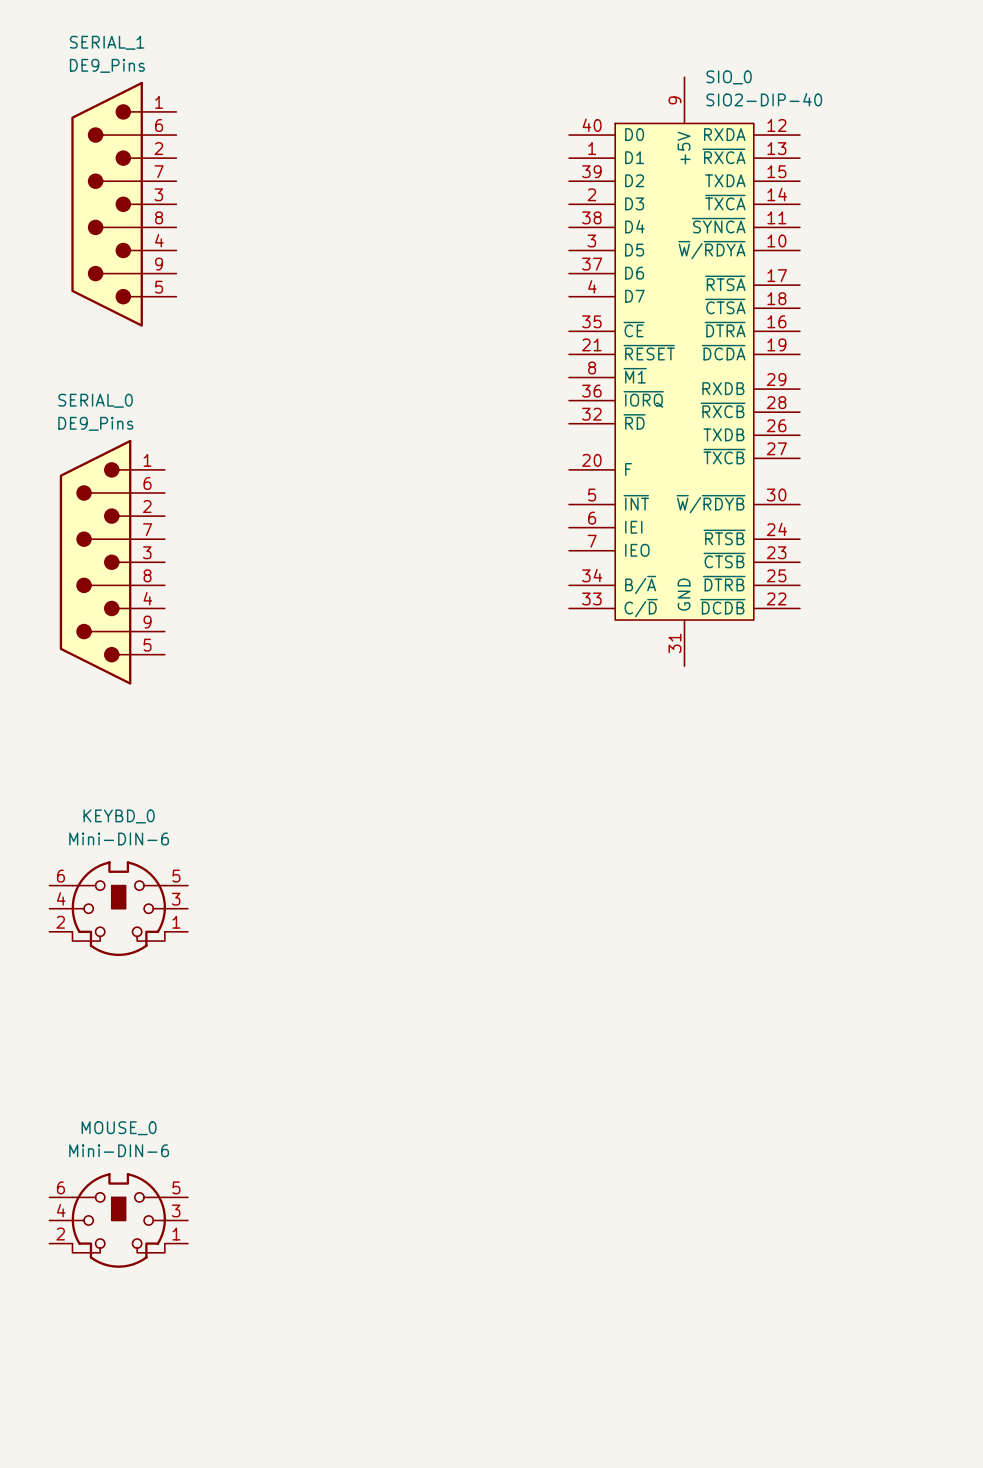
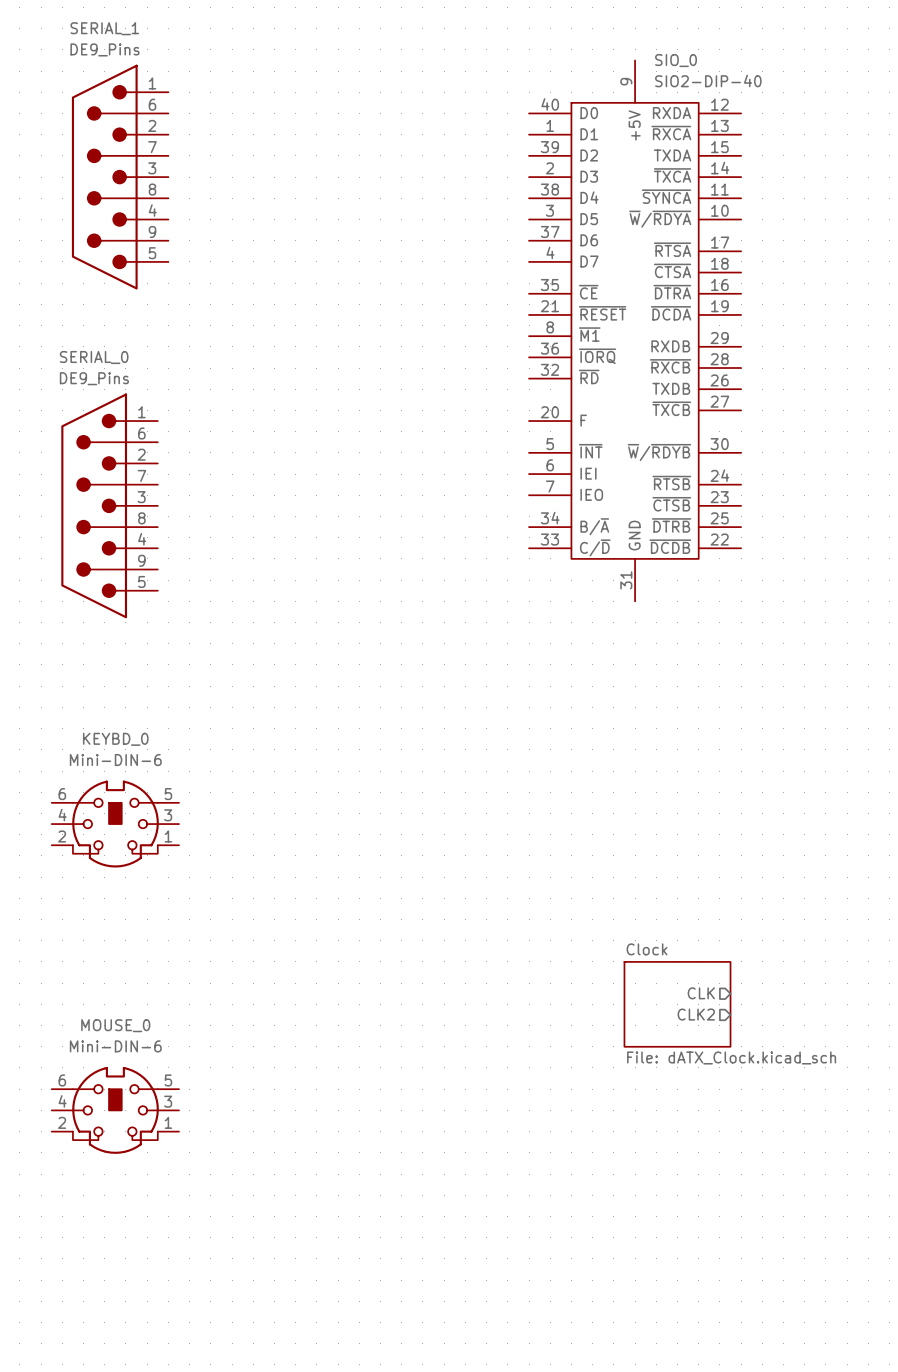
sheet pin: none -> CLK (701, 993)
sheet Clock: none -> File: dATX_Clock.kicad_sch (677, 1004)
sheet pin: none -> CLK2 (696, 1014)

